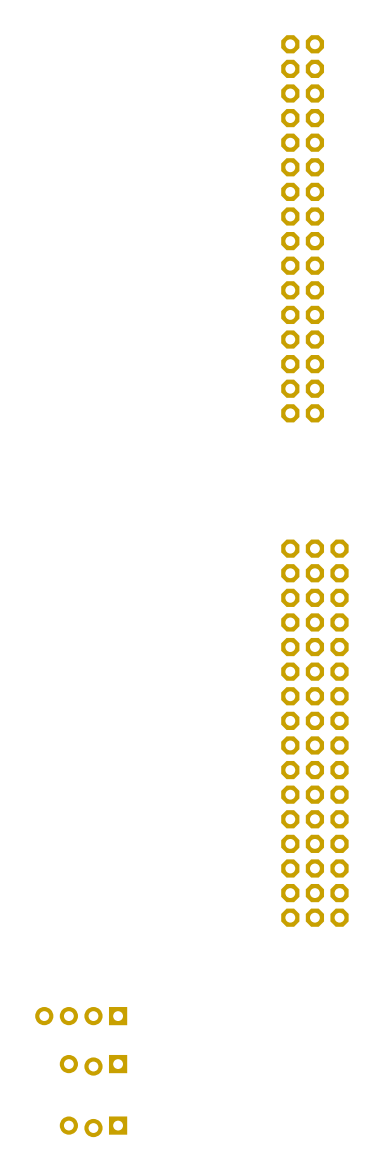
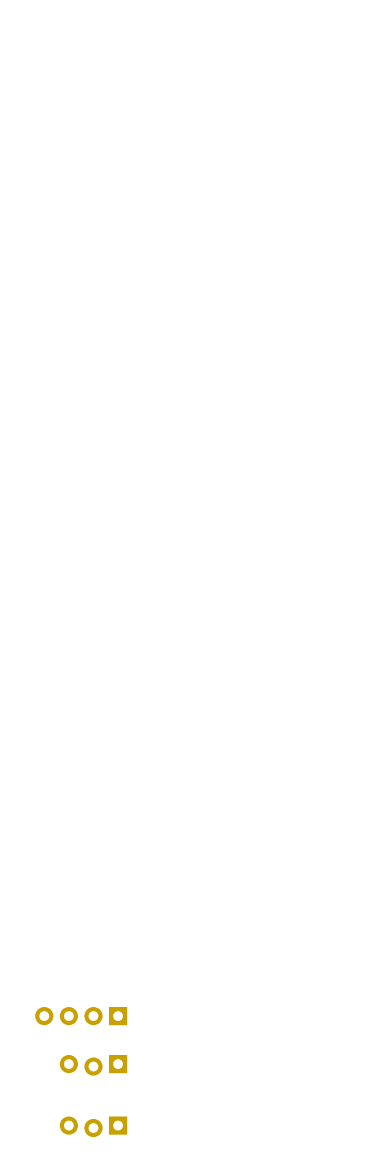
part: (302, 228) -> none
part: (314, 733) -> none

